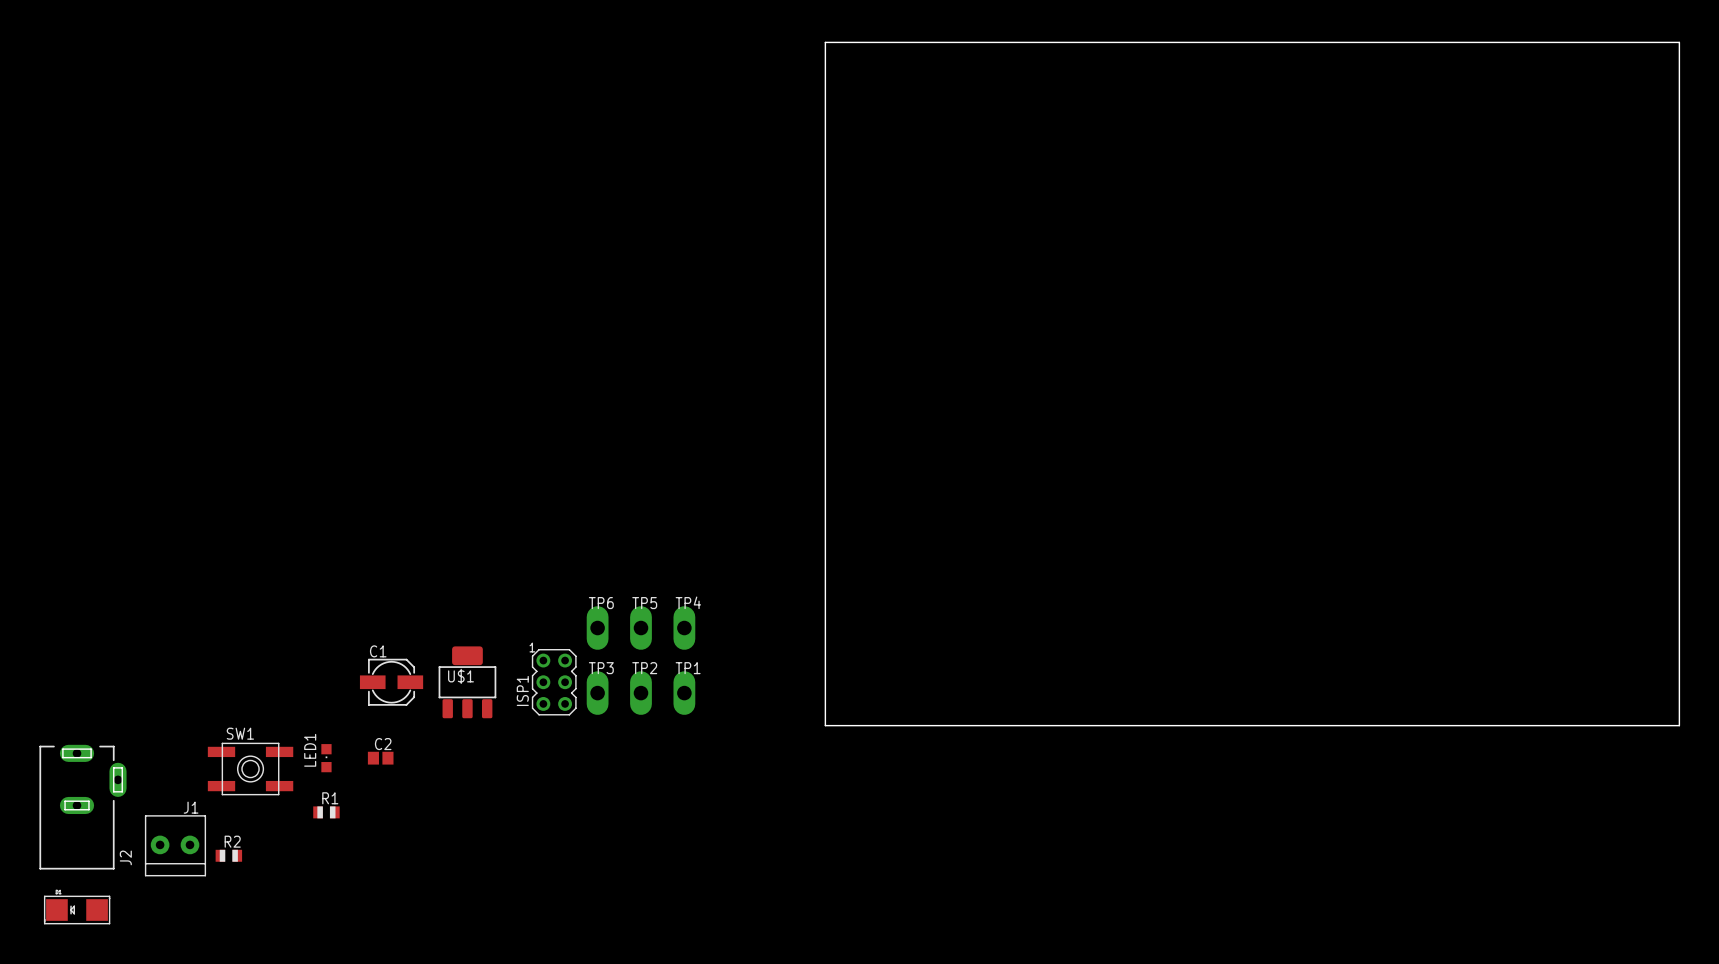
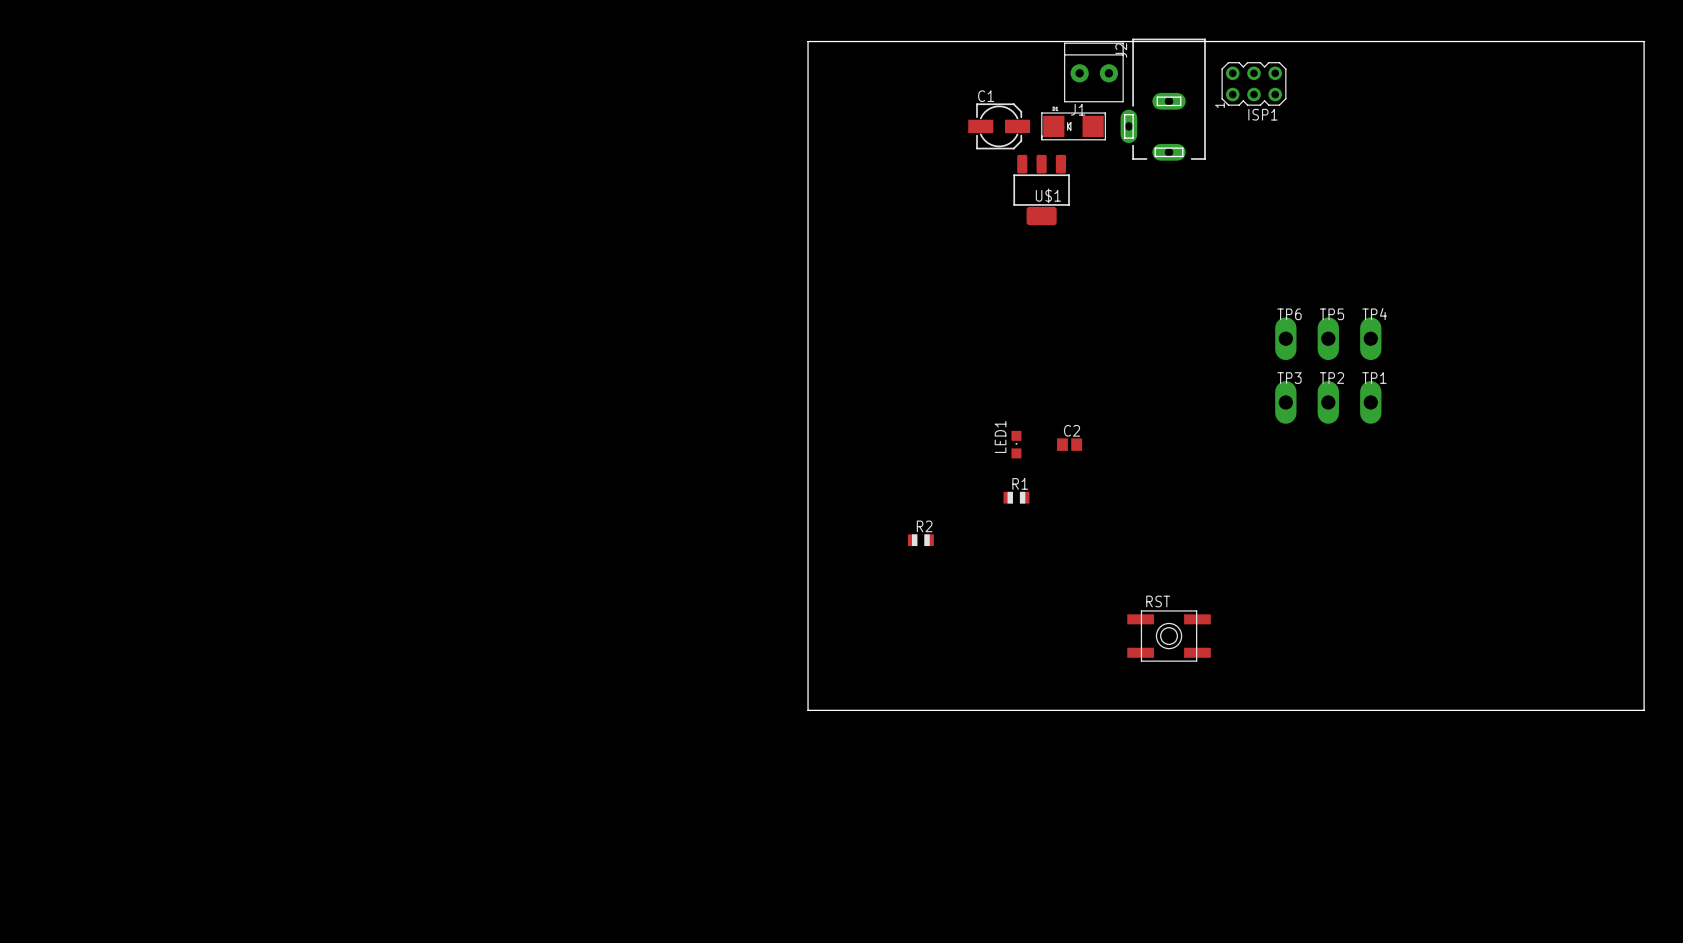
TP6 position: (597, 628) -> (1285, 338)
TP5 position: (640, 628) -> (1328, 338)
TP4 position: (684, 628) -> (1370, 338)
RST: none -> (1169, 636)
C1 position: (391, 682) -> (999, 126)
U$1 rotation: 0° (467, 682) -> 180° (1041, 190)
U$1 position: (467, 682) -> (1041, 190)
ISP1 rotation: 0° (554, 682) -> 90° counterclockwise (1253, 83)
ISP1 position: (554, 682) -> (1253, 83)
TP3 position: (597, 693) -> (1285, 402)
TP2 position: (640, 693) -> (1328, 402)
TP1 position: (684, 693) -> (1370, 402)
LED1 position: (326, 758) -> (1016, 444)
C2 position: (380, 758) -> (1069, 444)
SW1: (250, 769) -> none
J2 rotation: 0° (82, 807) -> 180° (1163, 99)
J2 position: (82, 807) -> (1163, 99)
R1 position: (326, 812) -> (1016, 497)
J1 rotation: 0° (175, 845) -> 180° (1093, 72)
J1 position: (175, 845) -> (1093, 72)
R2 position: (228, 855) -> (920, 540)
part position: (77, 910) -> (1073, 126)

